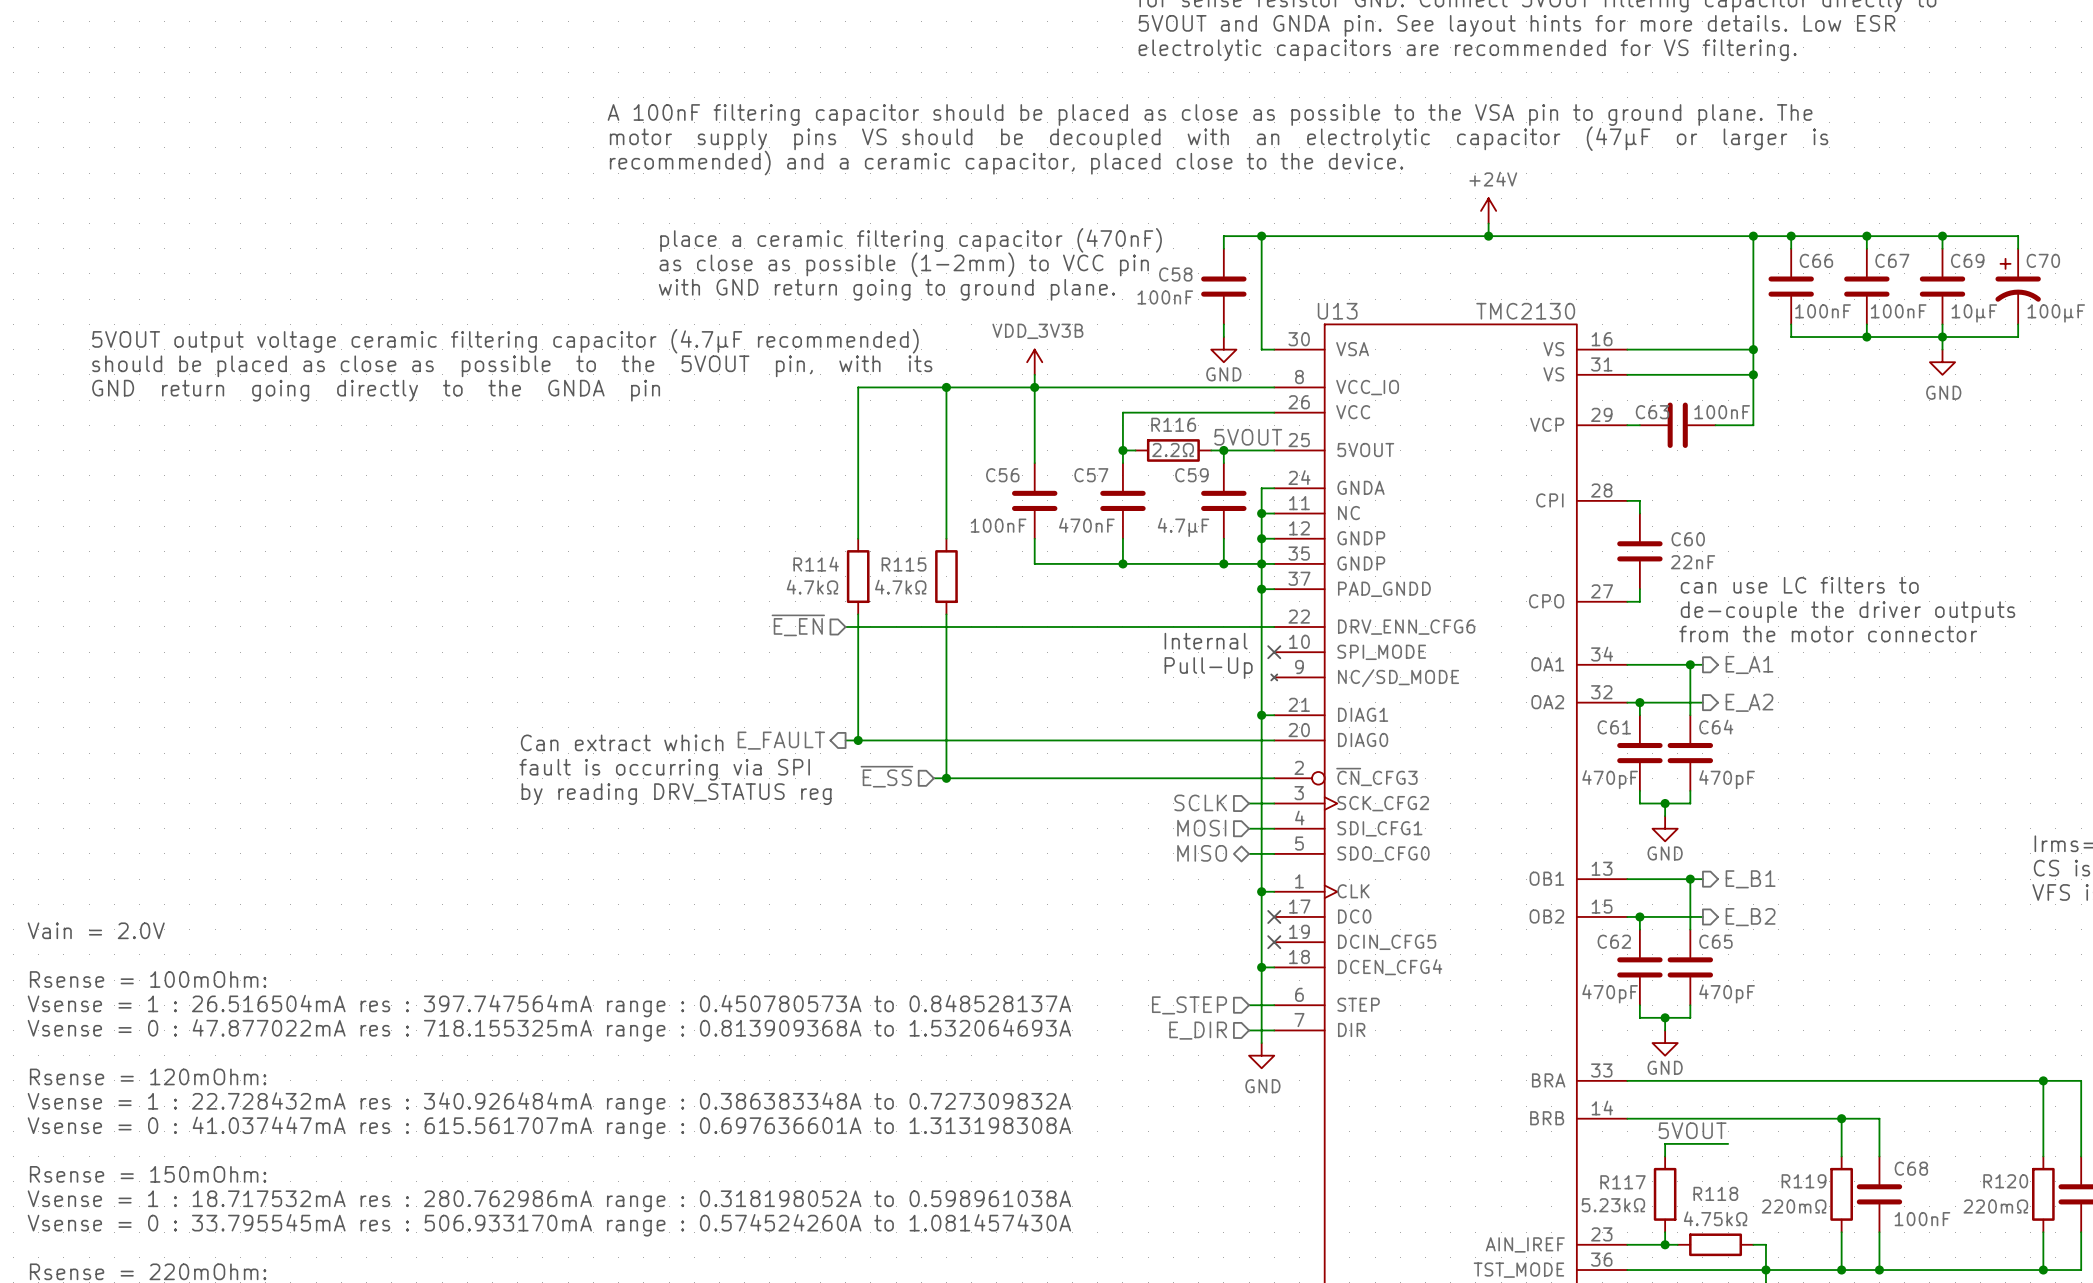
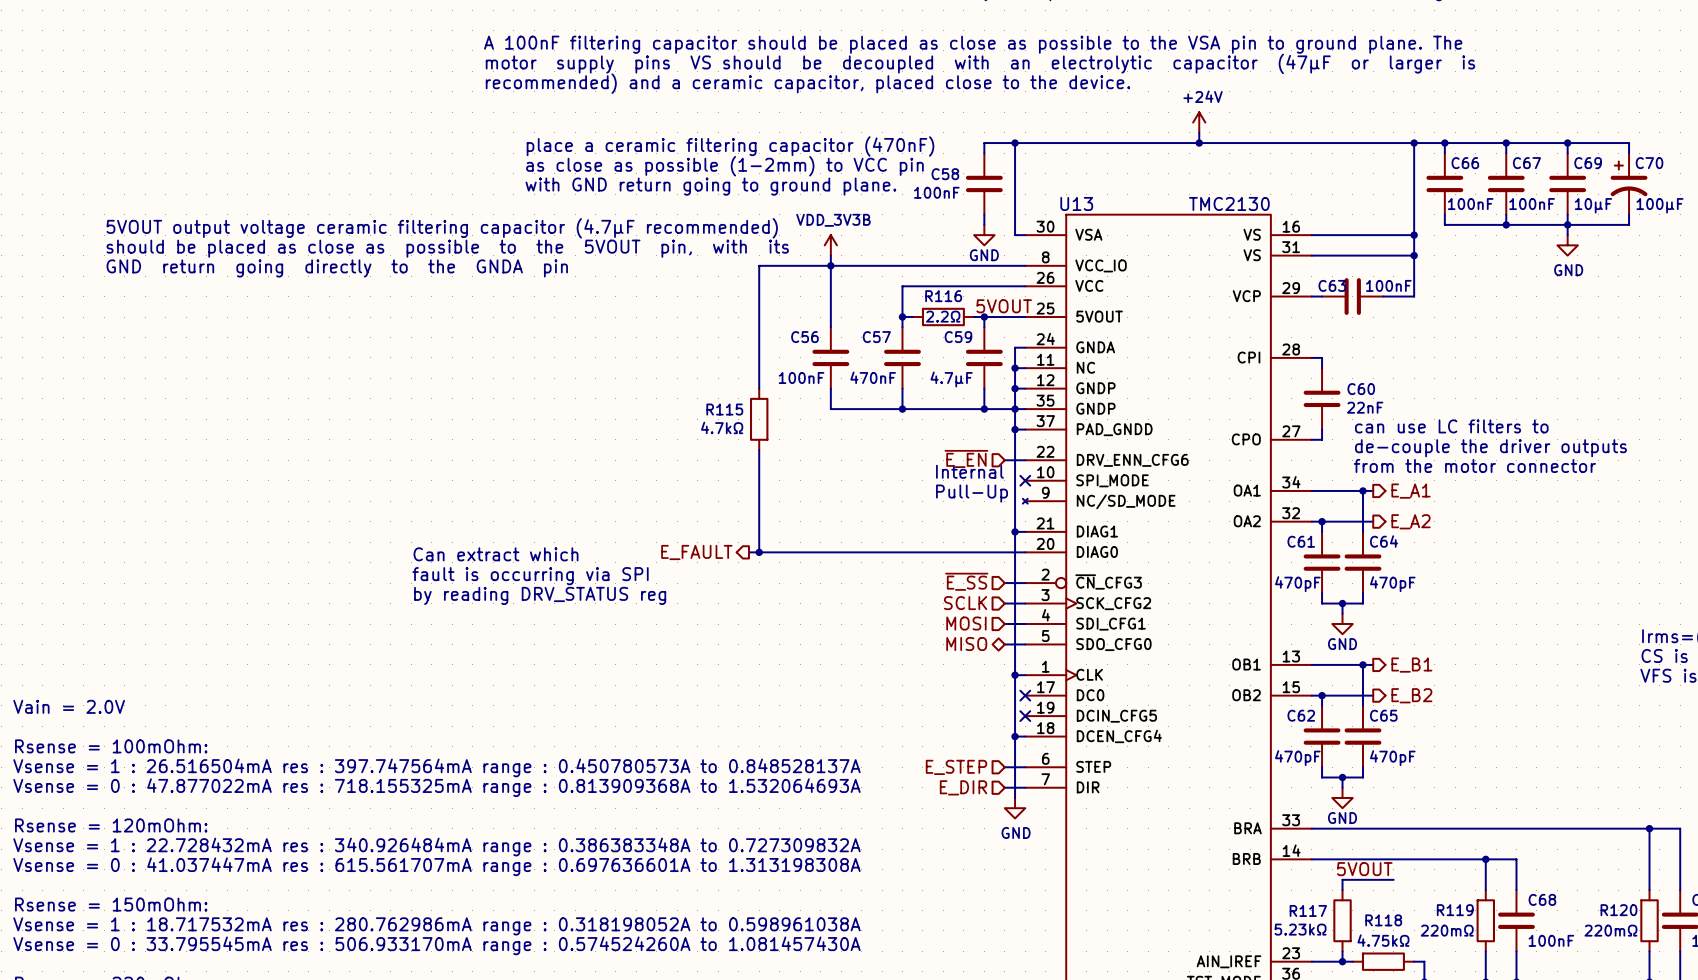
text position: 5VOUT output voltage ceramic filtering capacitor (4.7μF recommended) (505, 341) -> 5VOUT output voltage ceramic filtering capacitor (4.7μF recommended) (442, 228)
text position: should be placed as close as possible to the 5VOUT pin, with its (512, 366) -> should be placed as close as possible to the 5VOUT pin, with its (447, 248)
wire: (946, 387) (858, 387) (858, 538) -> none
junction: (946, 387) -> none
text position: GND return going directly to the GNDA pin (376, 390) -> GND return going directly to the GNDA pin (337, 268)
R114: 4.7kΩ (858, 576) -> none
wire: (858, 614) (858, 740) -> none
hierarchical label: ~{E_EN} (798, 625) -> none
hierarchical label: none -> ~{E_EN} (966, 458)
wire: (845, 626) (1249, 626) -> none
hierarchical label position: E_FAULT (781, 740) -> E_FAULT (696, 552)
wire: (845, 740) (933, 740) -> none
junction: (858, 740) -> none
wire: (946, 740) (946, 778) -> none
hierarchical label: ~{E_SS} (886, 776) -> none
hierarchical label: none -> ~{E_SS} (966, 581)
wire: (933, 778) (1249, 778) -> none
junction position: (946, 778) -> (759, 552)

